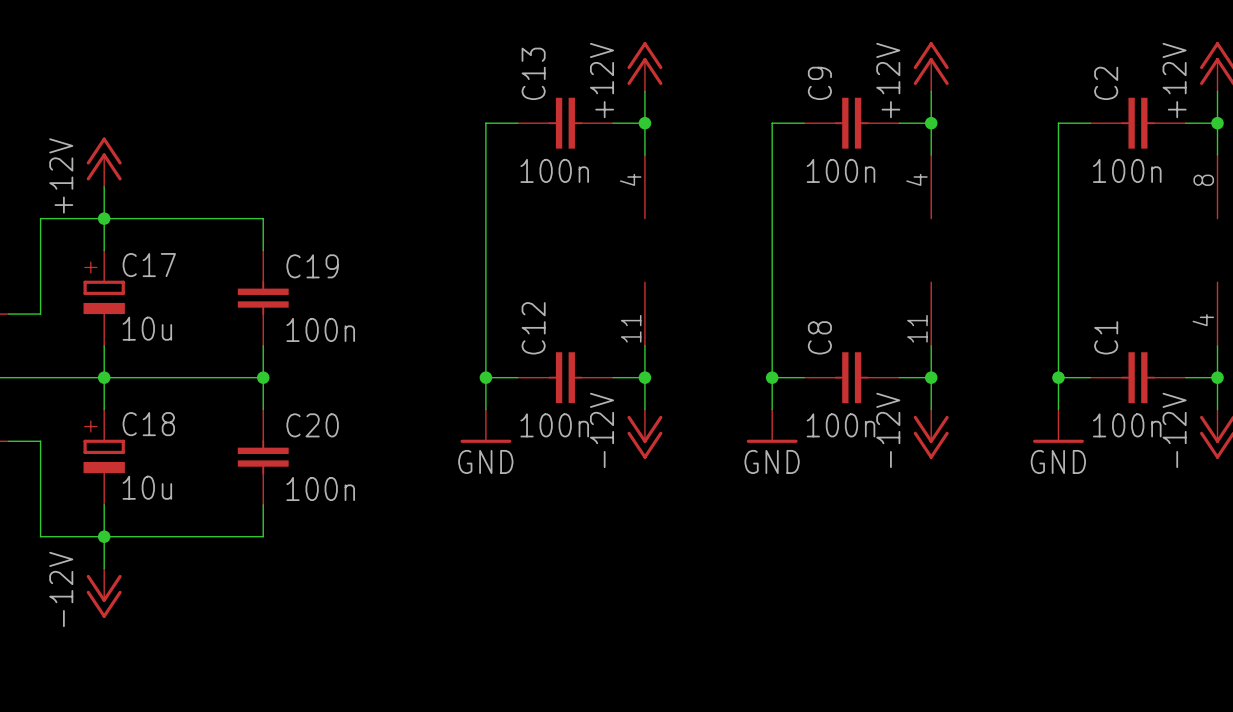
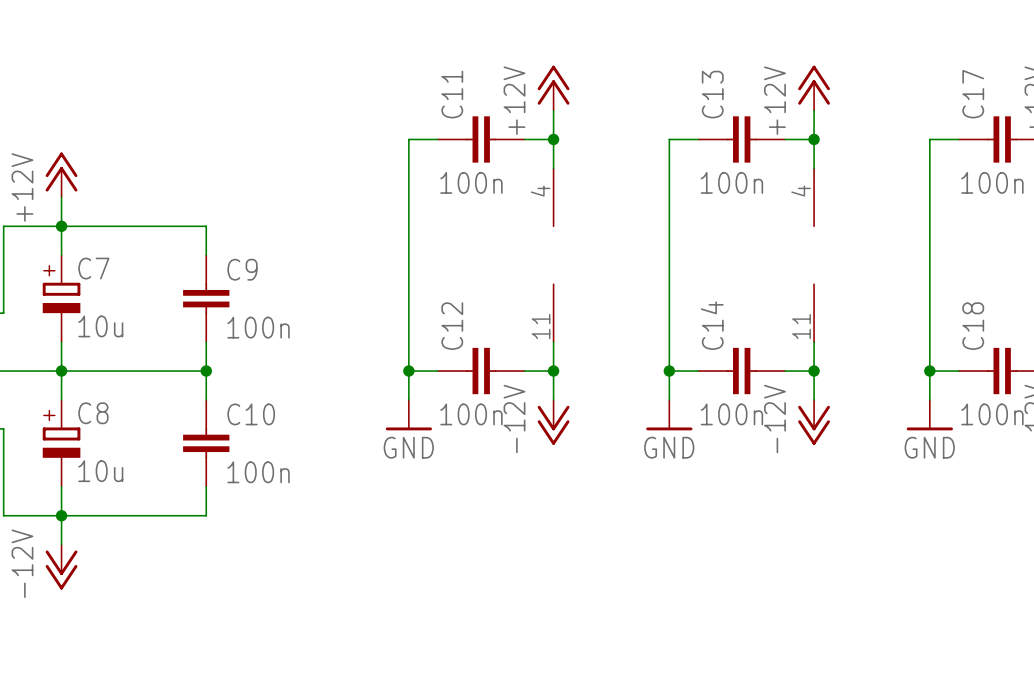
C13 name: C13 (533, 73) -> C11 (452, 94)
C9 name: C9 (819, 83) -> C13 (712, 94)
C2 name: C2 (1106, 83) -> C17 (973, 94)
C17 name: C17 (149, 265) -> C7 (93, 268)
C19 name: C19 (312, 266) -> C9 (242, 269)
C8 name: C8 (819, 337) -> C14 (712, 325)
C1 name: C1 (1106, 337) -> C18 (973, 326)
C18 name: C18 (148, 424) -> C8 (93, 413)
C20 name: C20 (312, 425) -> C10 (251, 414)

